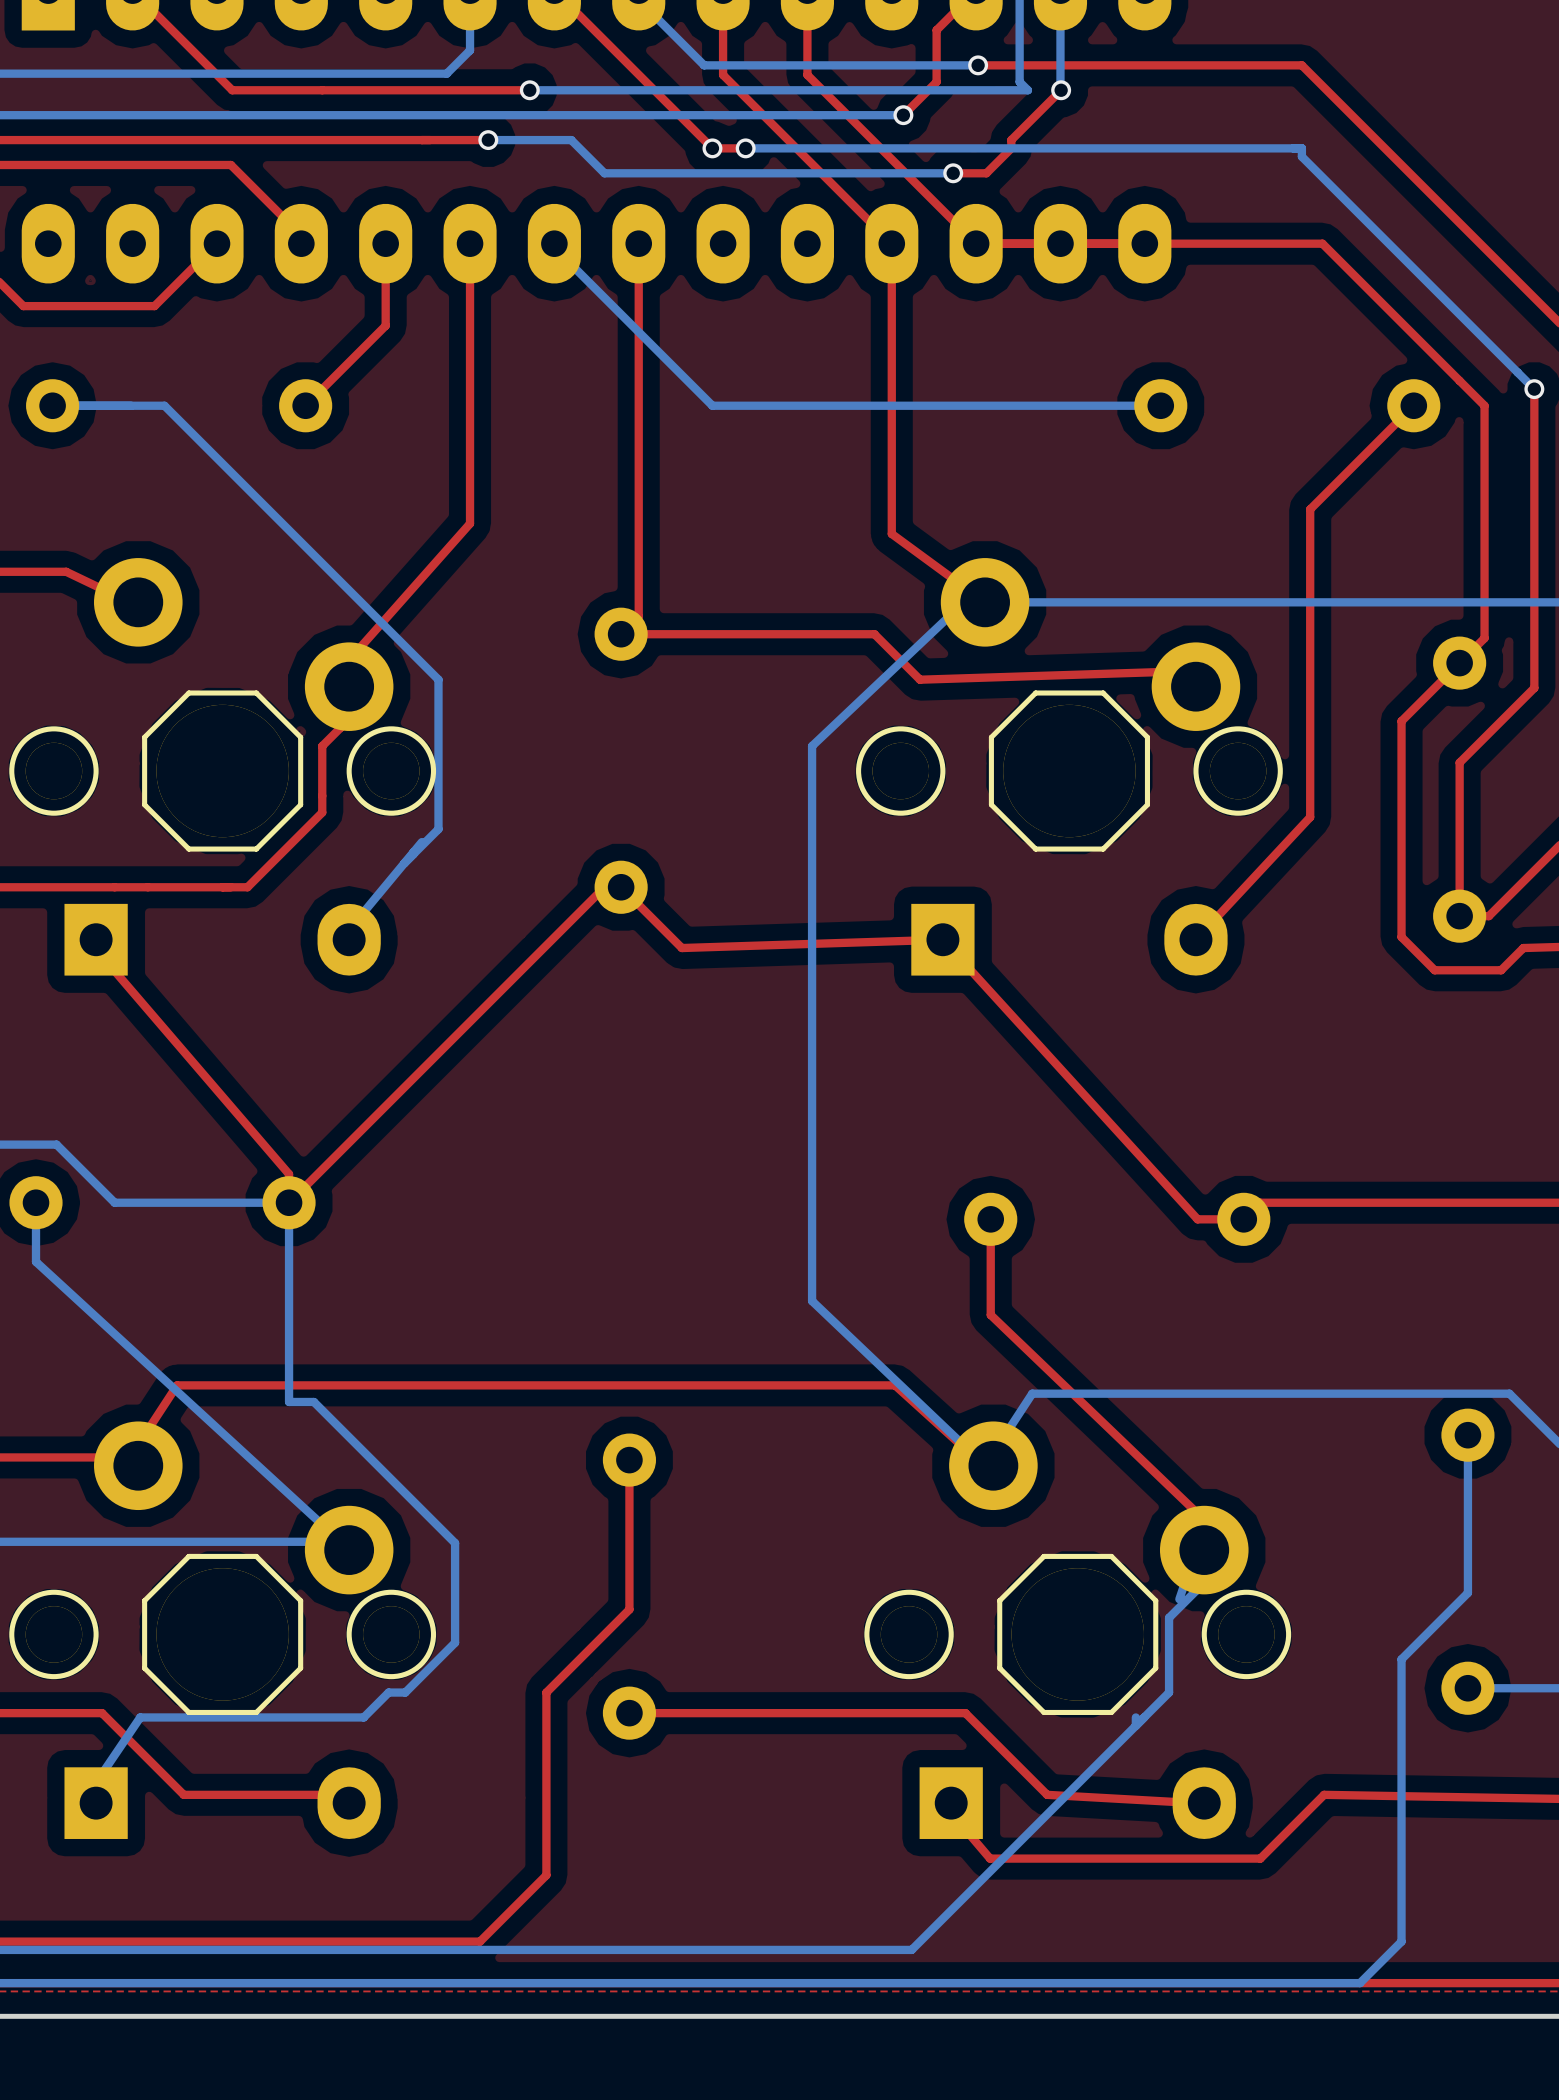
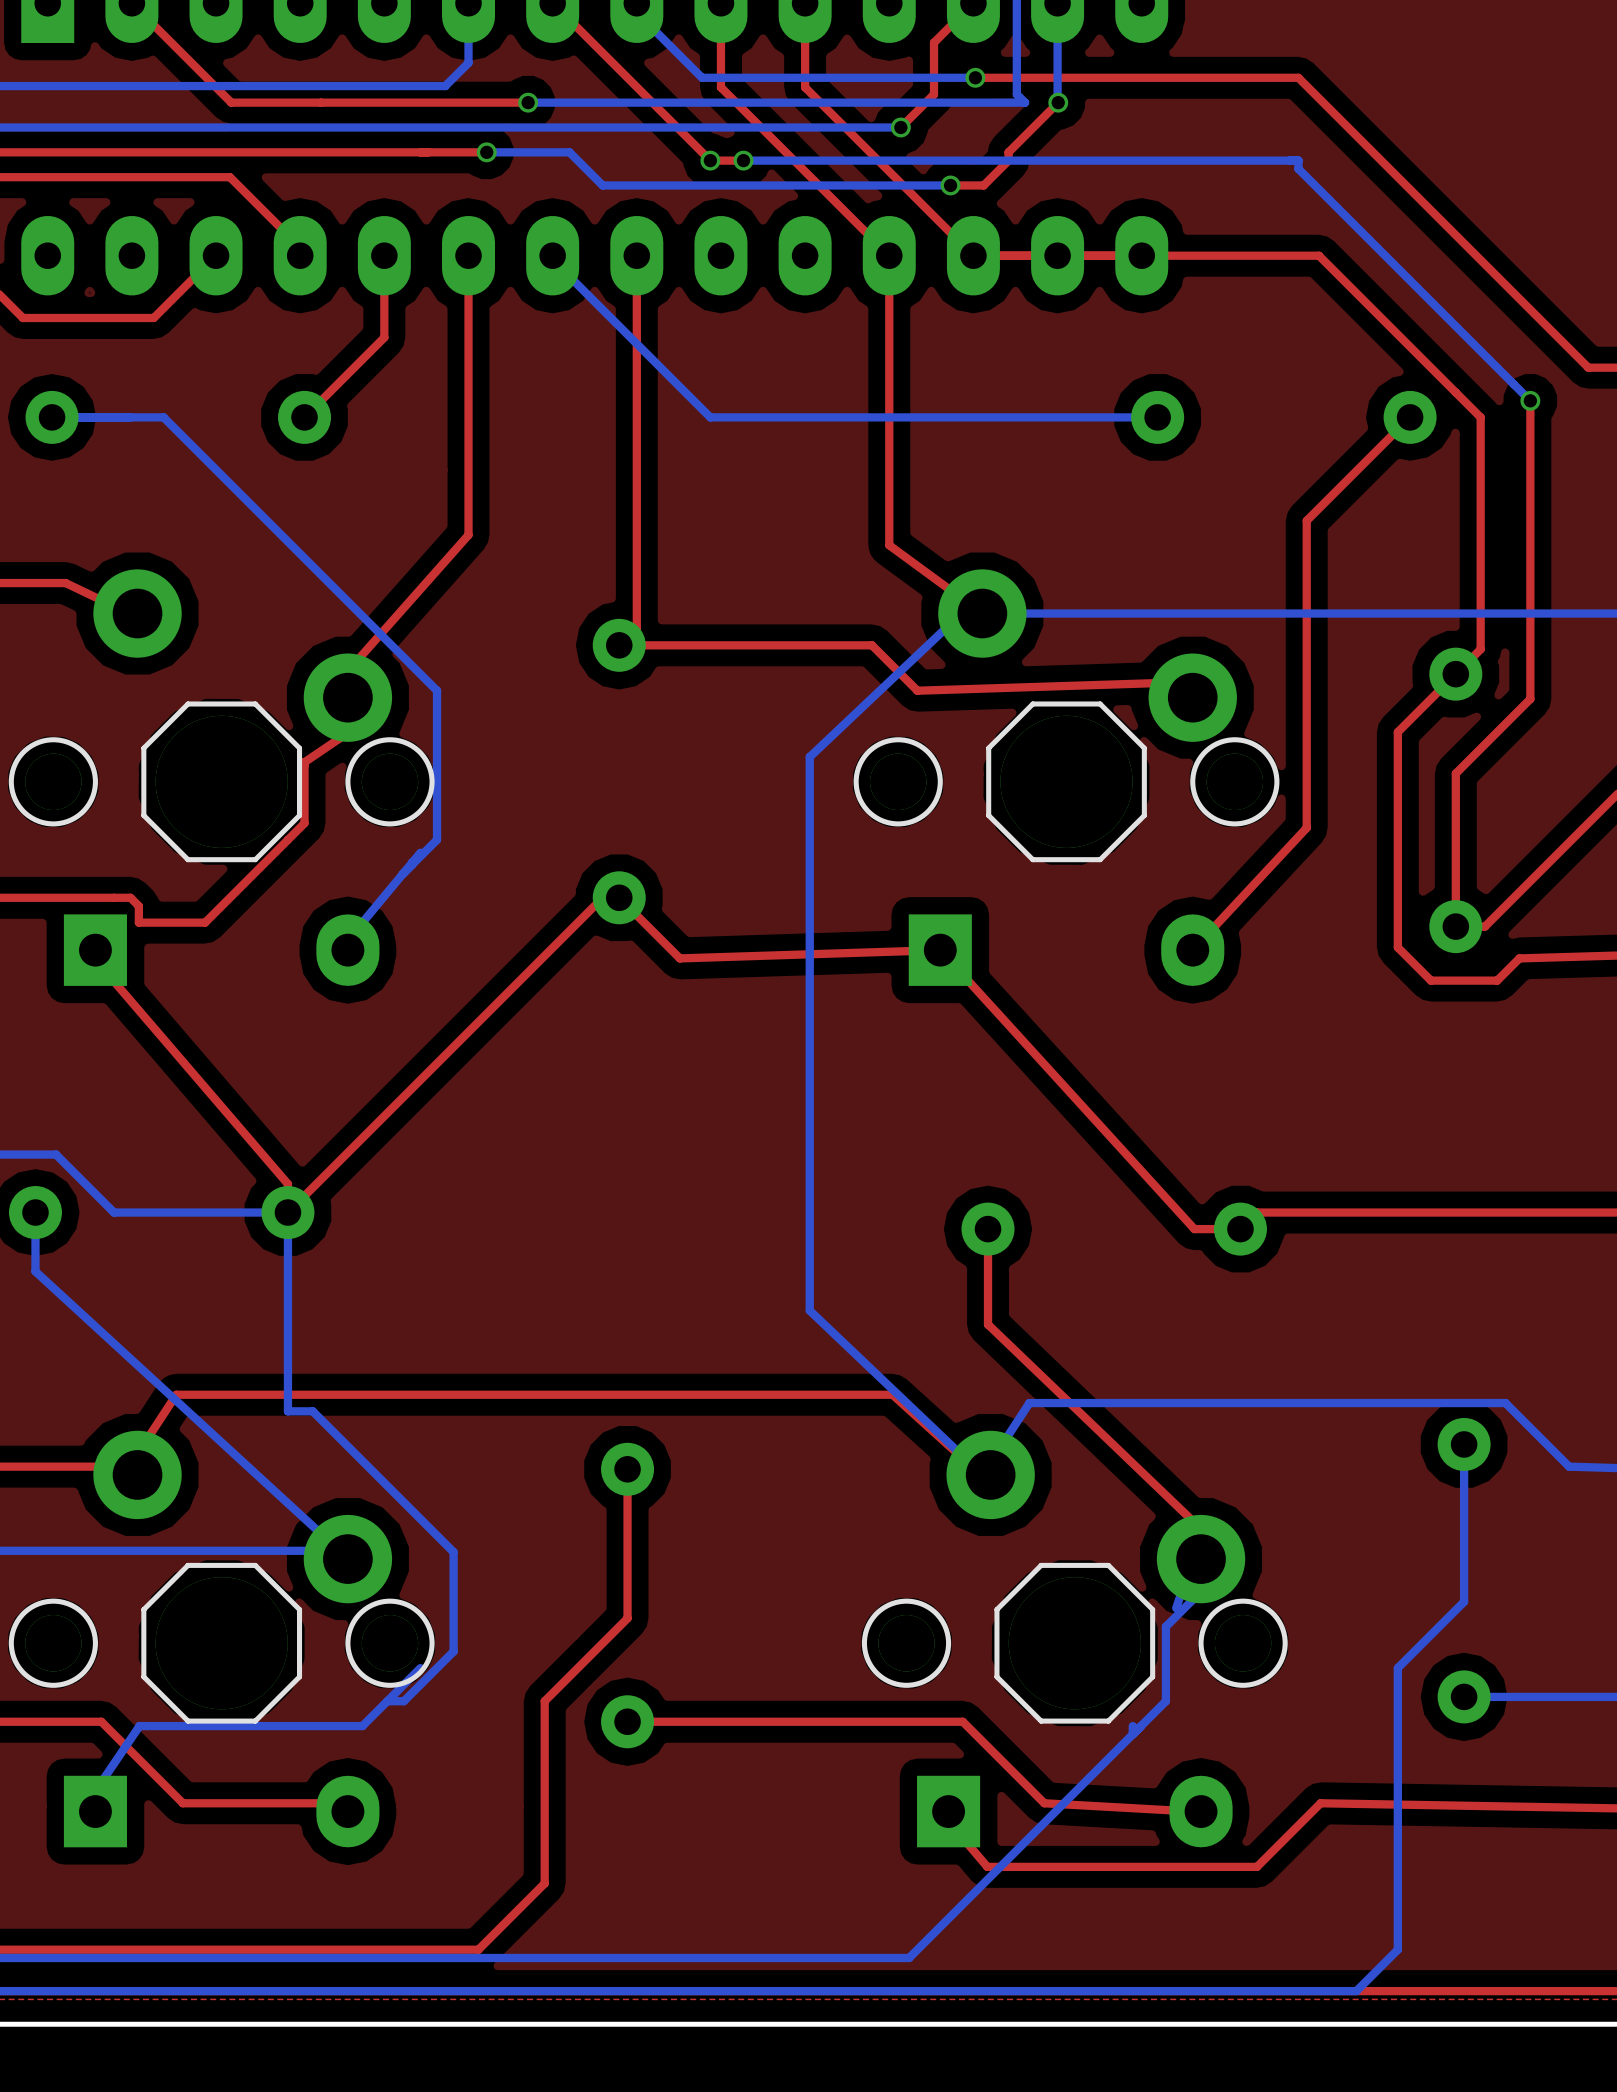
top track: (349, 686) (349, 719) (322, 746) (322, 812) (247, 887) (131, 887) -> (339, 738) (304, 762) (304, 823) (205, 922) (138, 922) (138, 906) (130, 897)
bottom track: none -> (420, 1668) (387, 1701)

